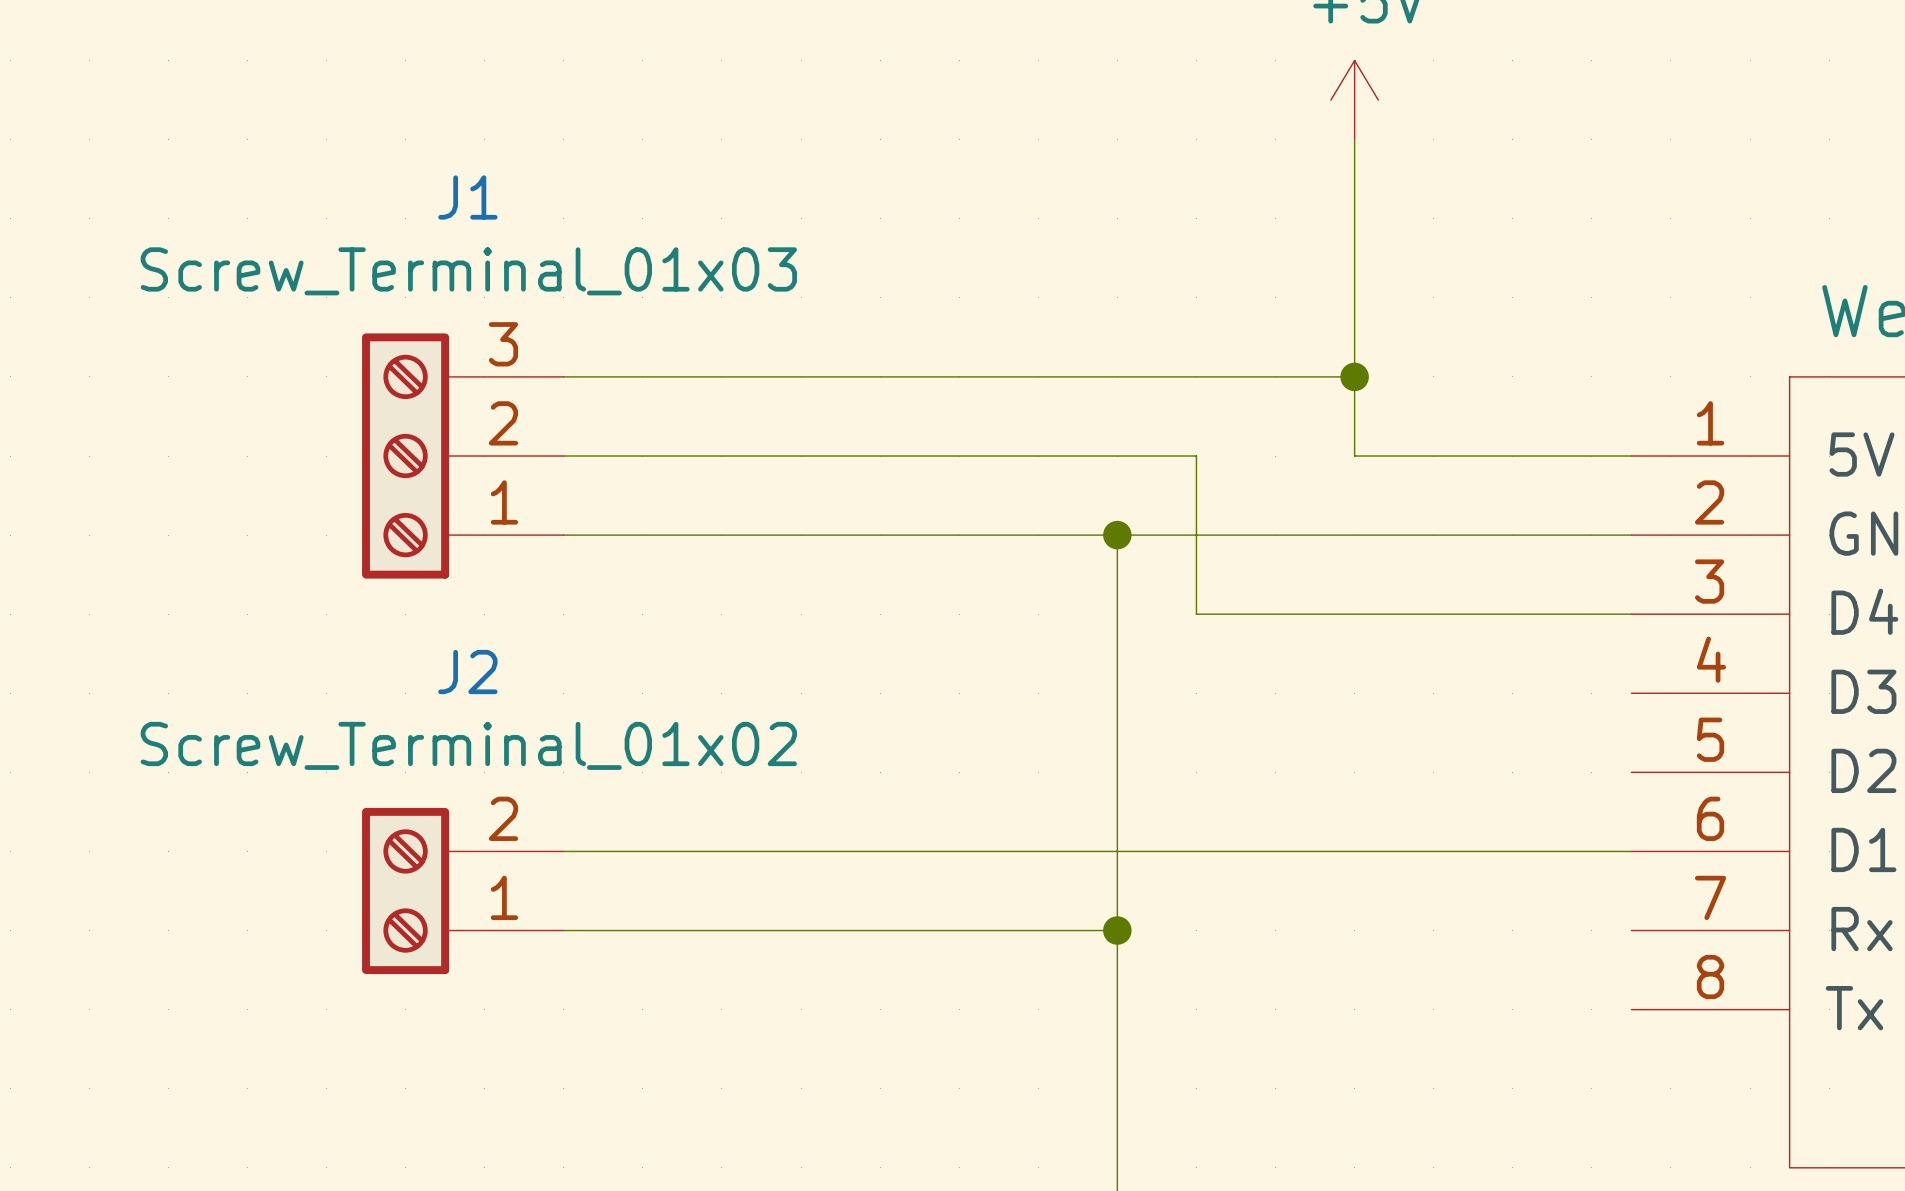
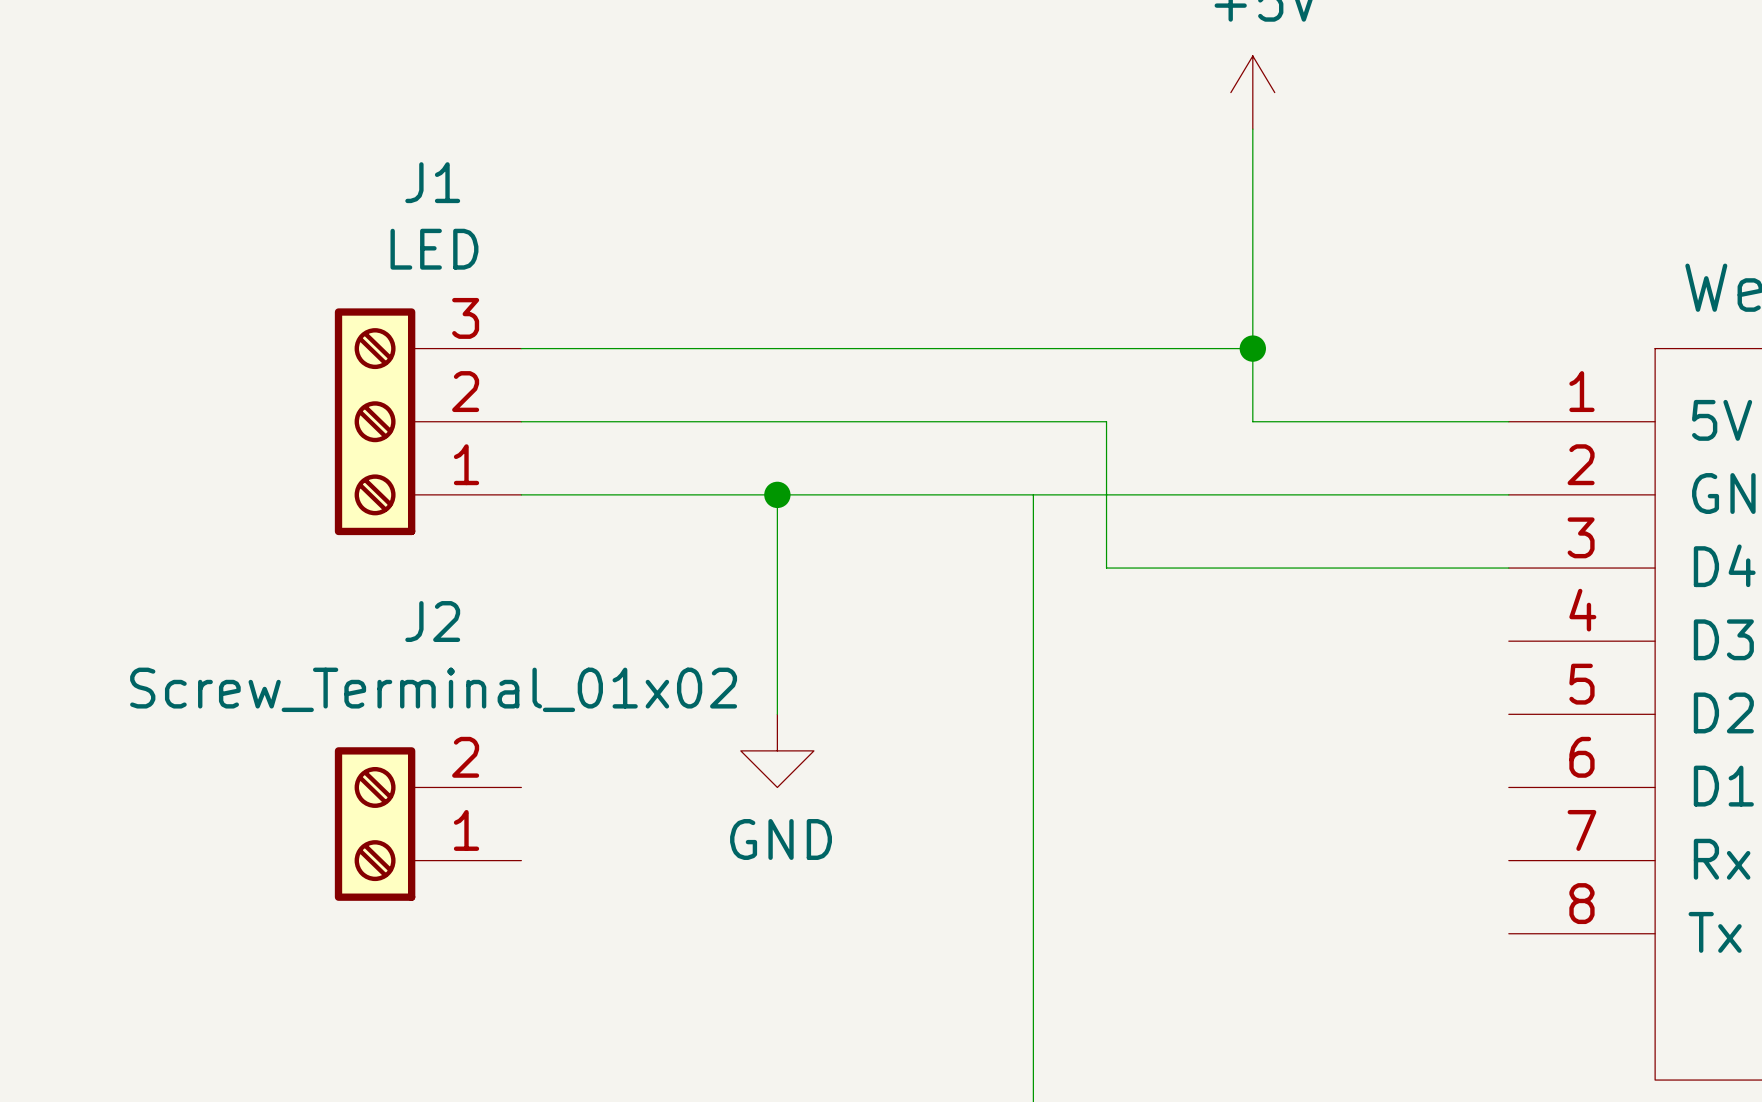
J1 value: Screw_Terminal_01x03 (468, 271) -> LED (434, 249)
wire: none -> (777, 494) (777, 714)
junction: none -> (777, 494)
junction: (1117, 535) -> none
power symbol: none -> GND (777, 750)
wire: (563, 851) (1631, 851) -> none
wire: (563, 930) (1117, 930) -> none
junction: (1117, 930) -> none

